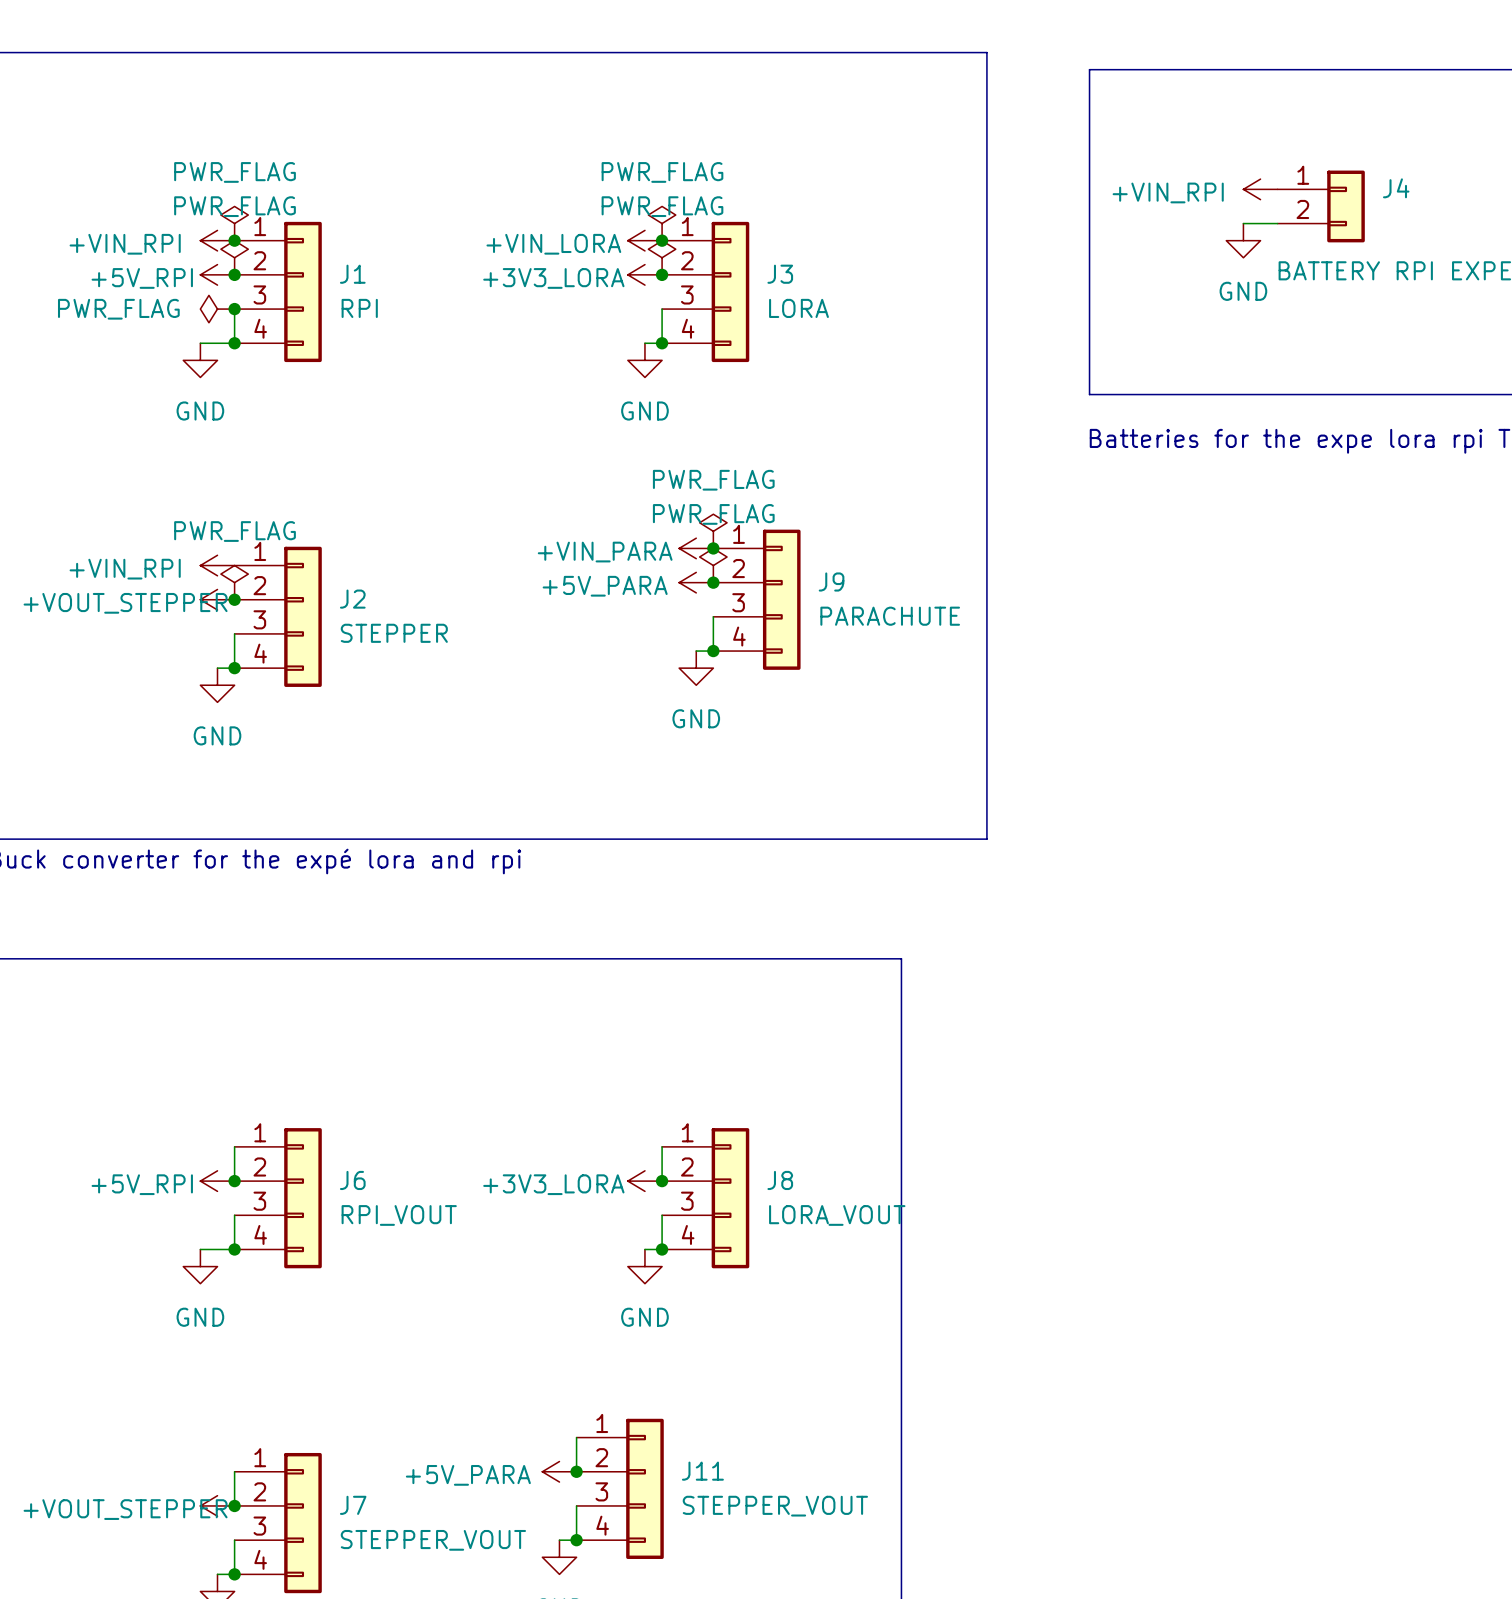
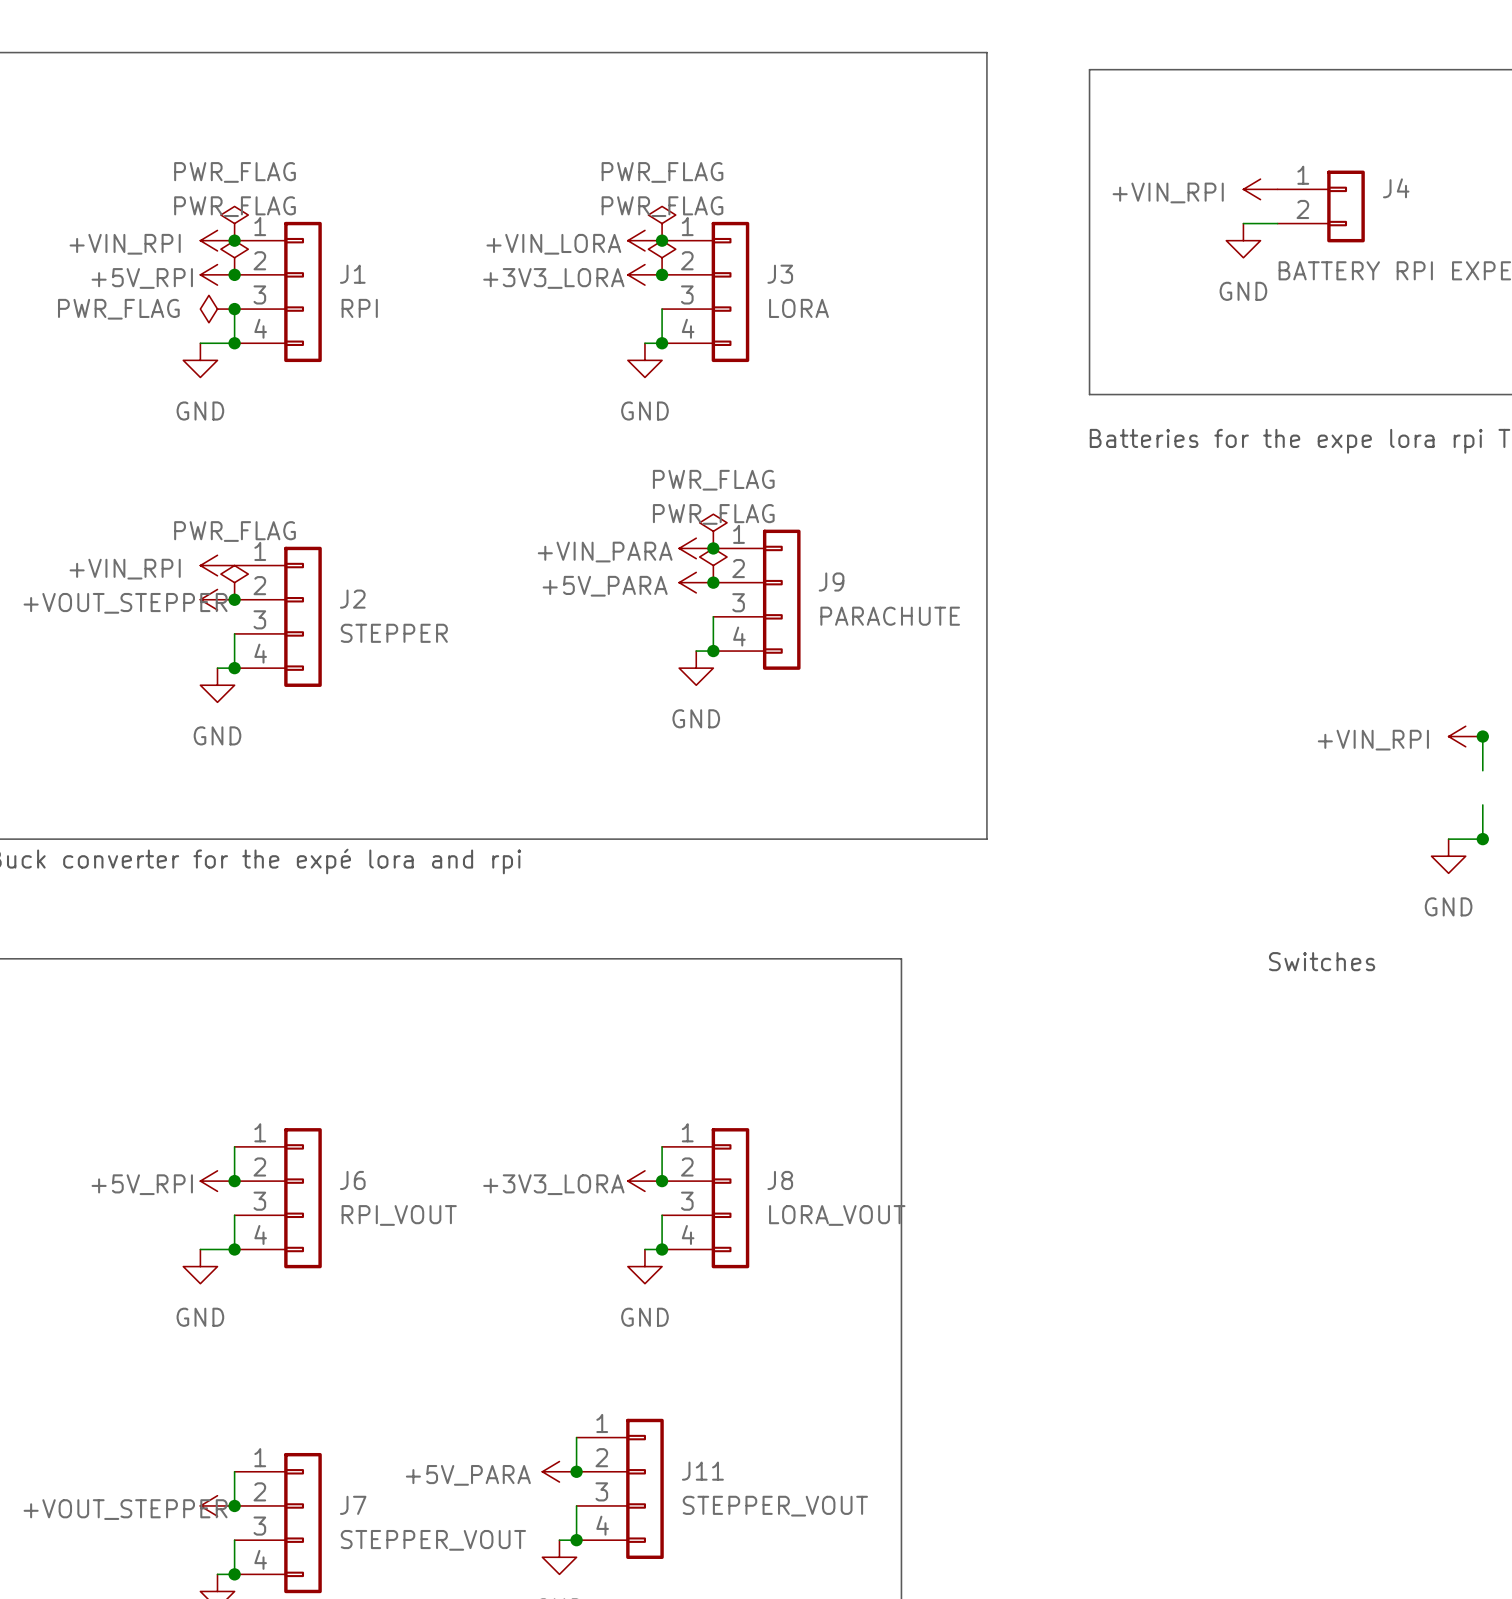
power symbol: none -> +VIN_RPI (1465, 736)
wire: none -> (1482, 736) (1482, 770)
junction: none -> (1482, 736)
wire: none -> (1482, 804) (1482, 839) (1448, 839)
junction: none -> (1482, 839)
power symbol: none -> GND (1448, 856)
text: none -> Switches (1322, 961)

